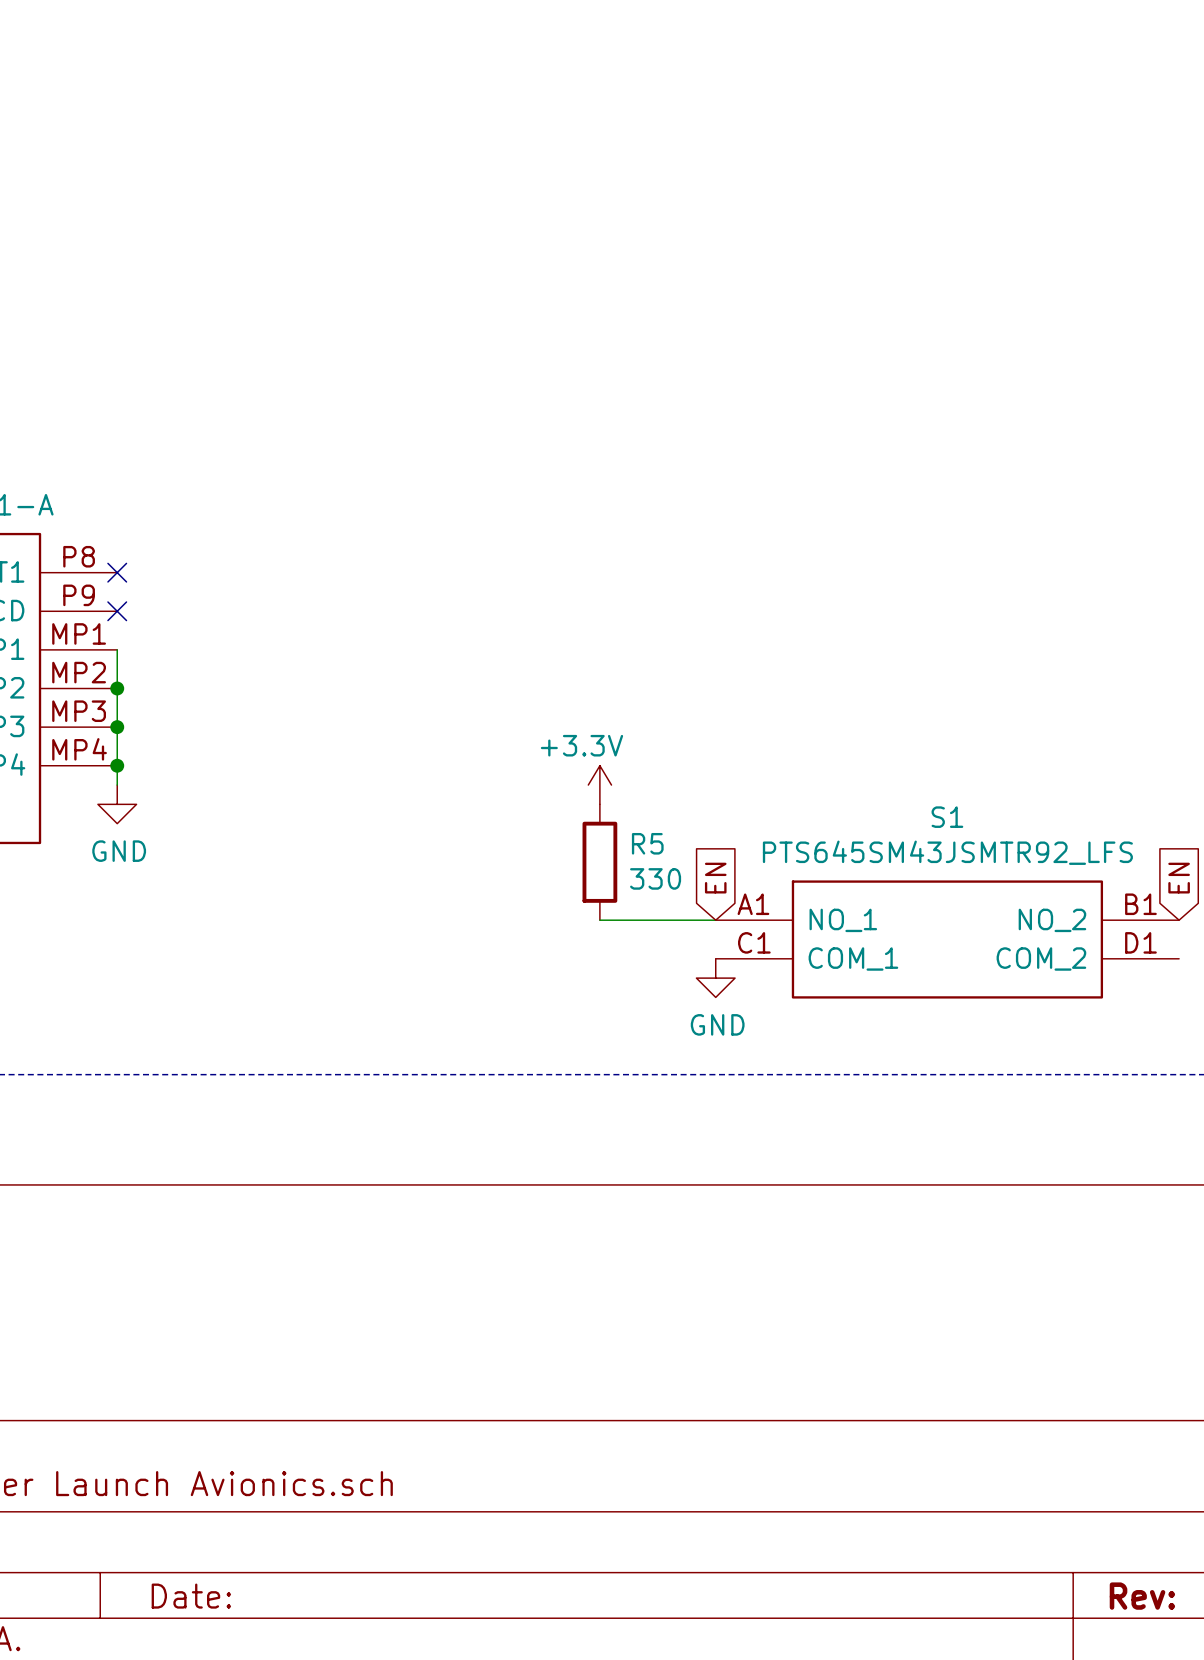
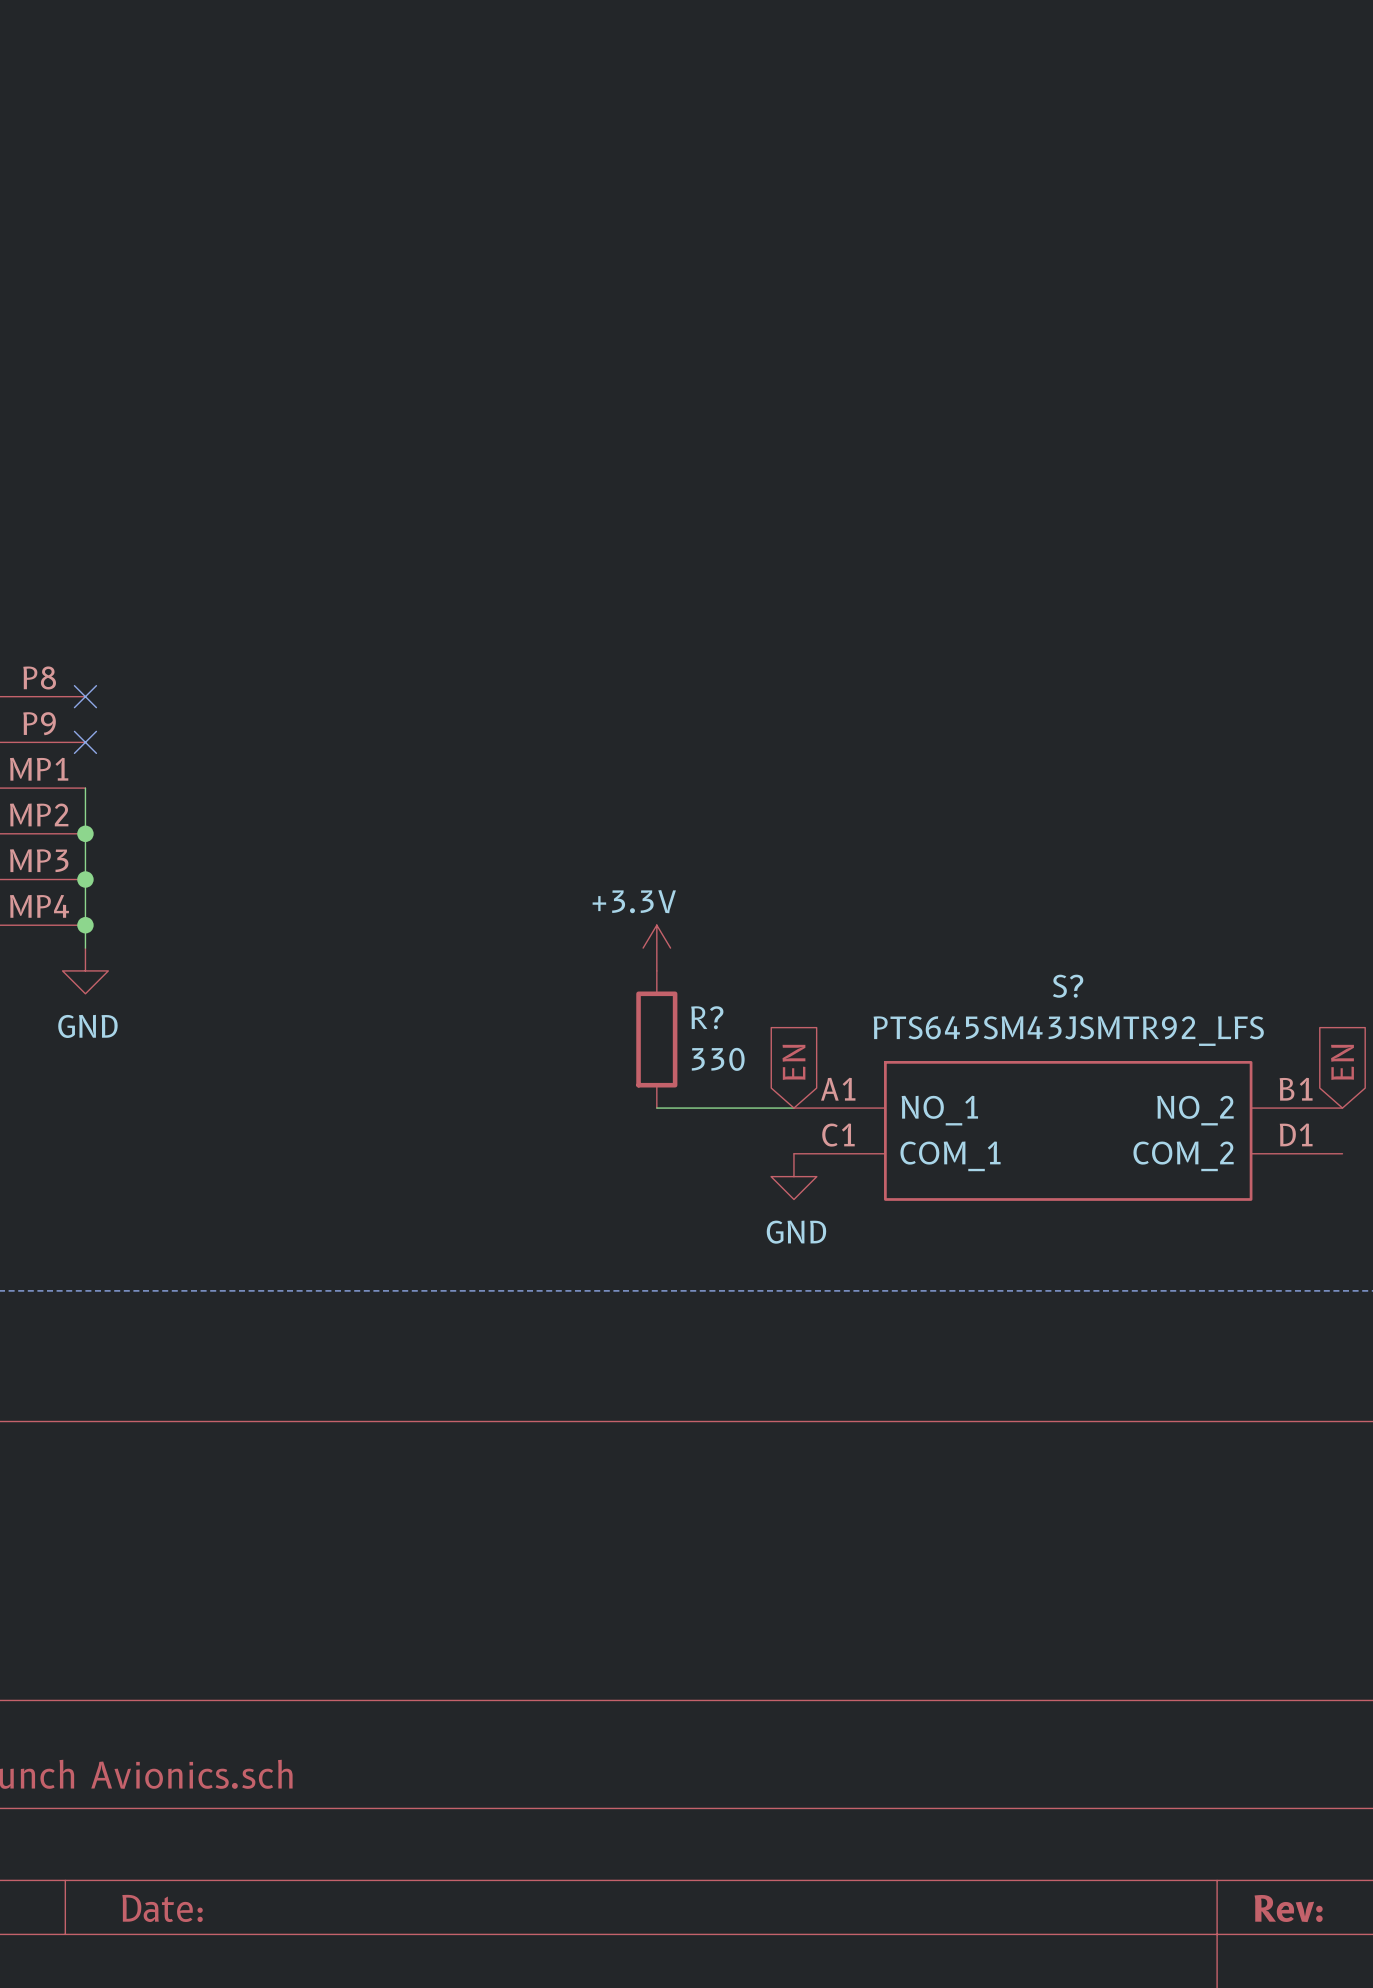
S1 name: S1 (947, 817) -> S? (1068, 986)
R5 name: R5 (647, 843) -> R? (707, 1017)

